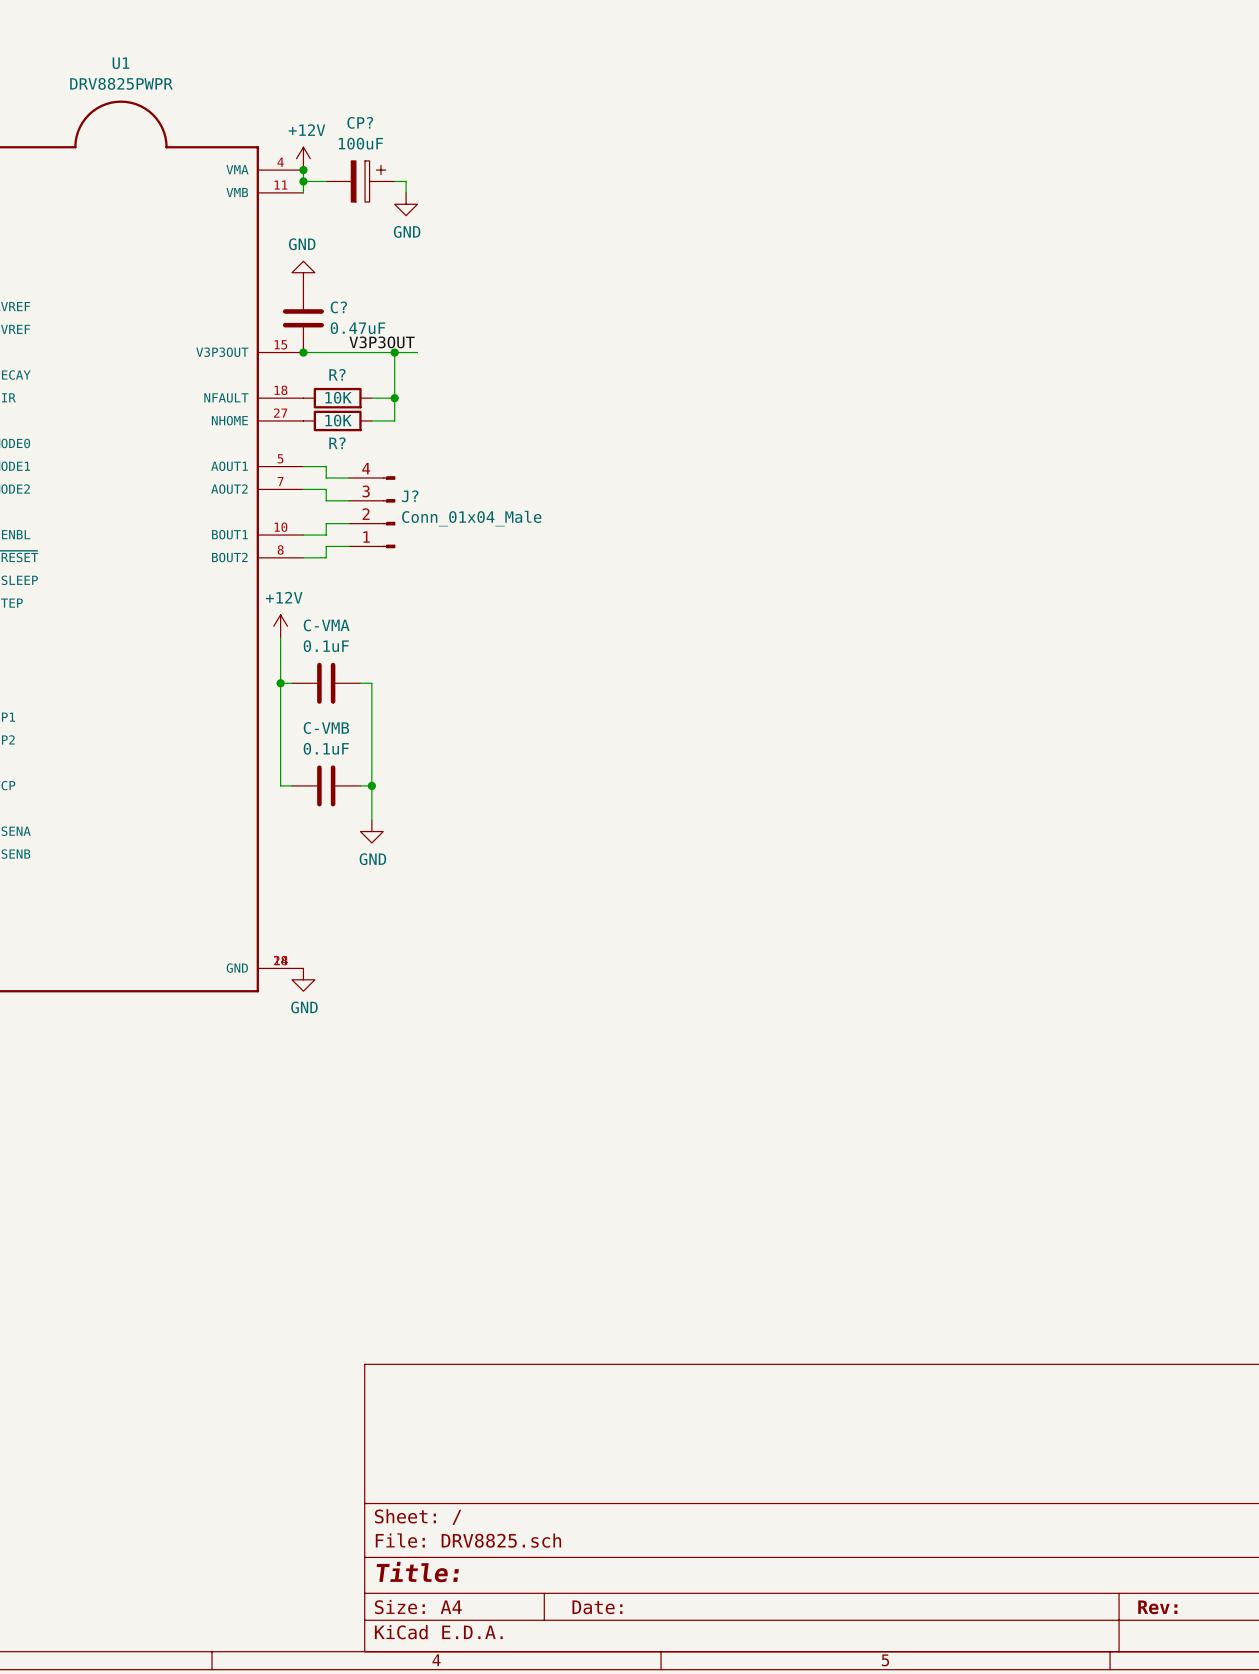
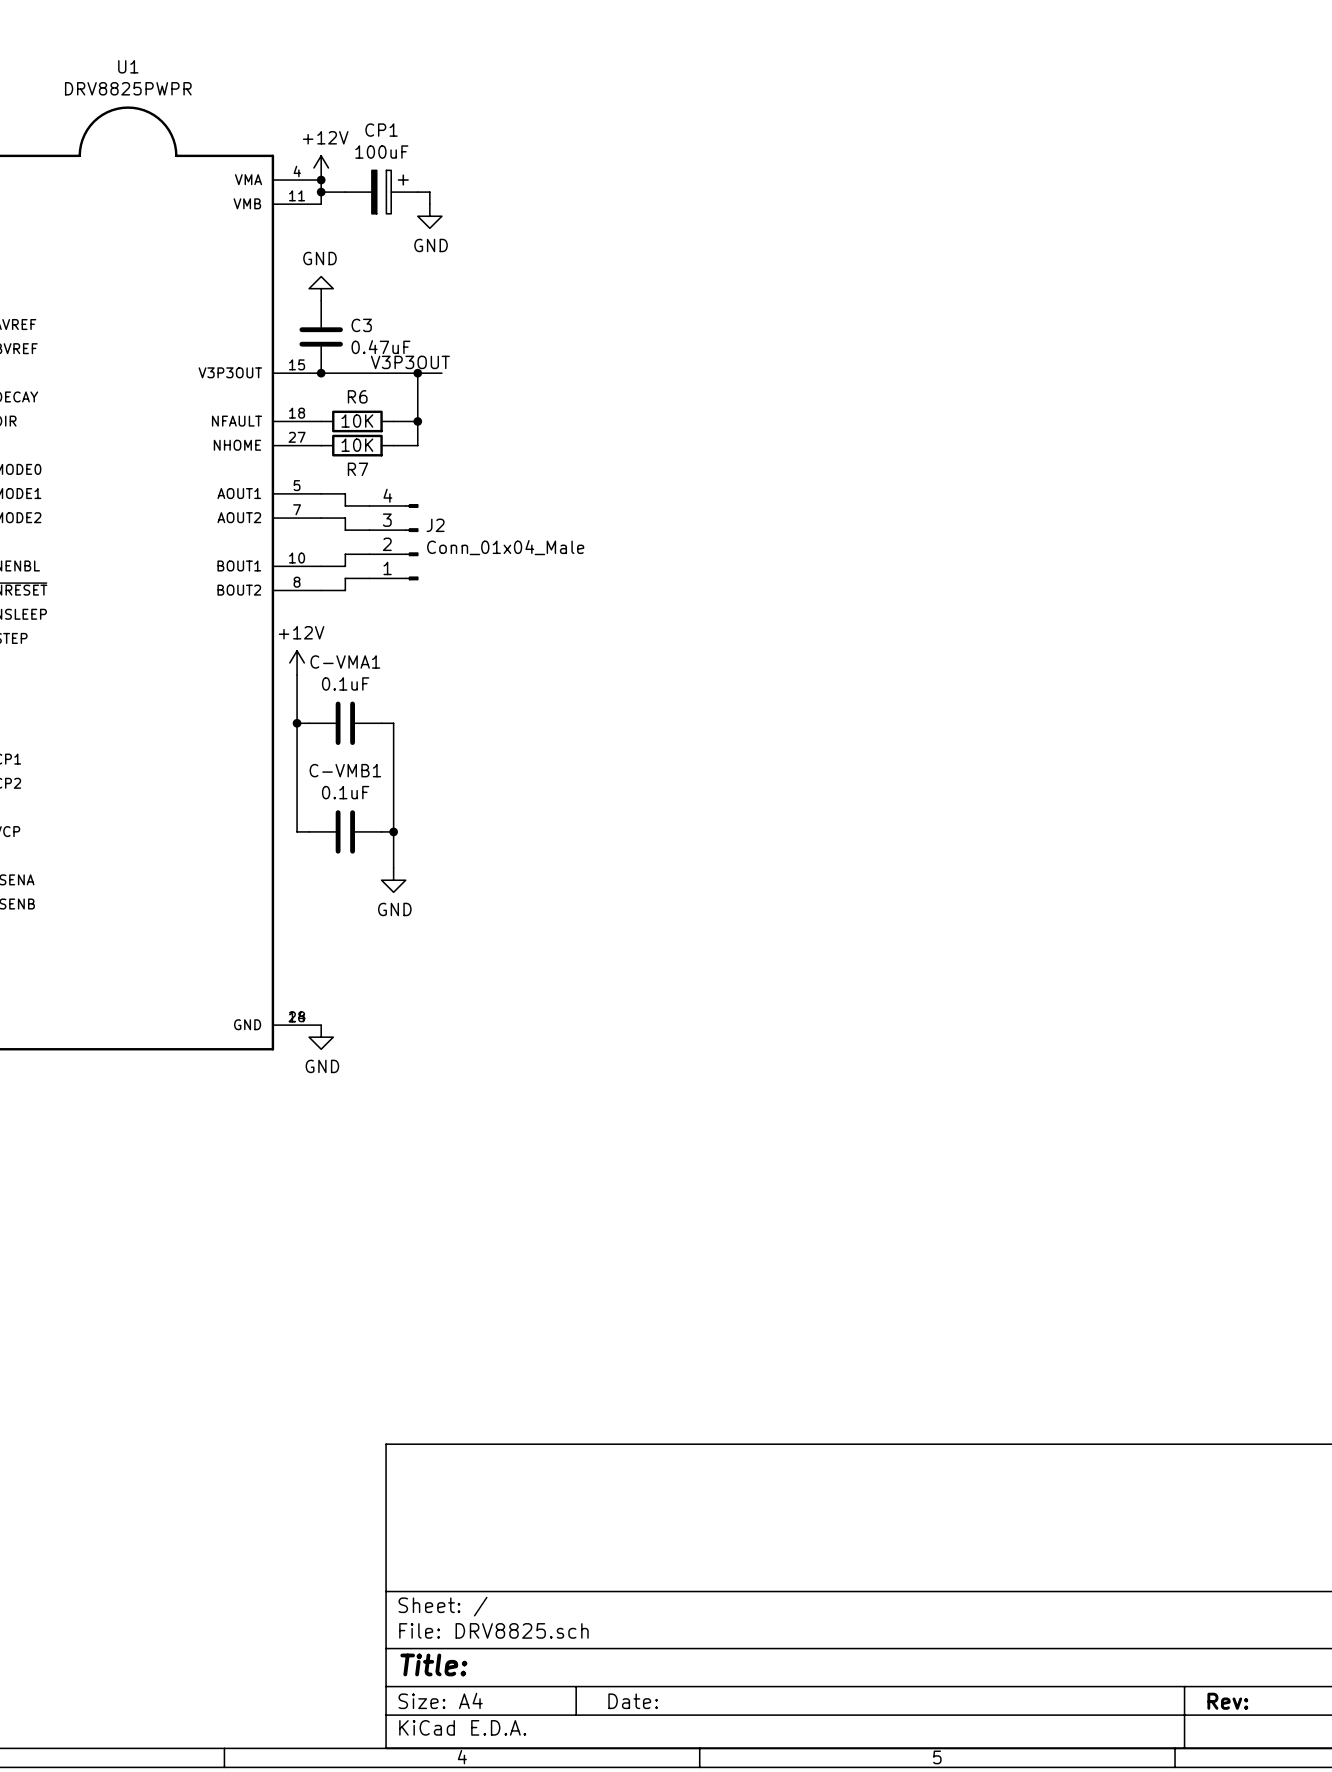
CP? name: CP? (360, 122) -> CP1 (381, 130)
C? name: C? (338, 307) -> C3 (361, 325)
R? name: R? (337, 374) -> R6 (357, 396)
R? name: R? (337, 443) -> R7 (357, 469)
J? name: J? (410, 496) -> J2 (435, 525)
C-VMA name: C-VMA (326, 625) -> C-VMA1 (345, 661)
C-VMB name: C-VMB (326, 728) -> C-VMB1 (345, 770)

